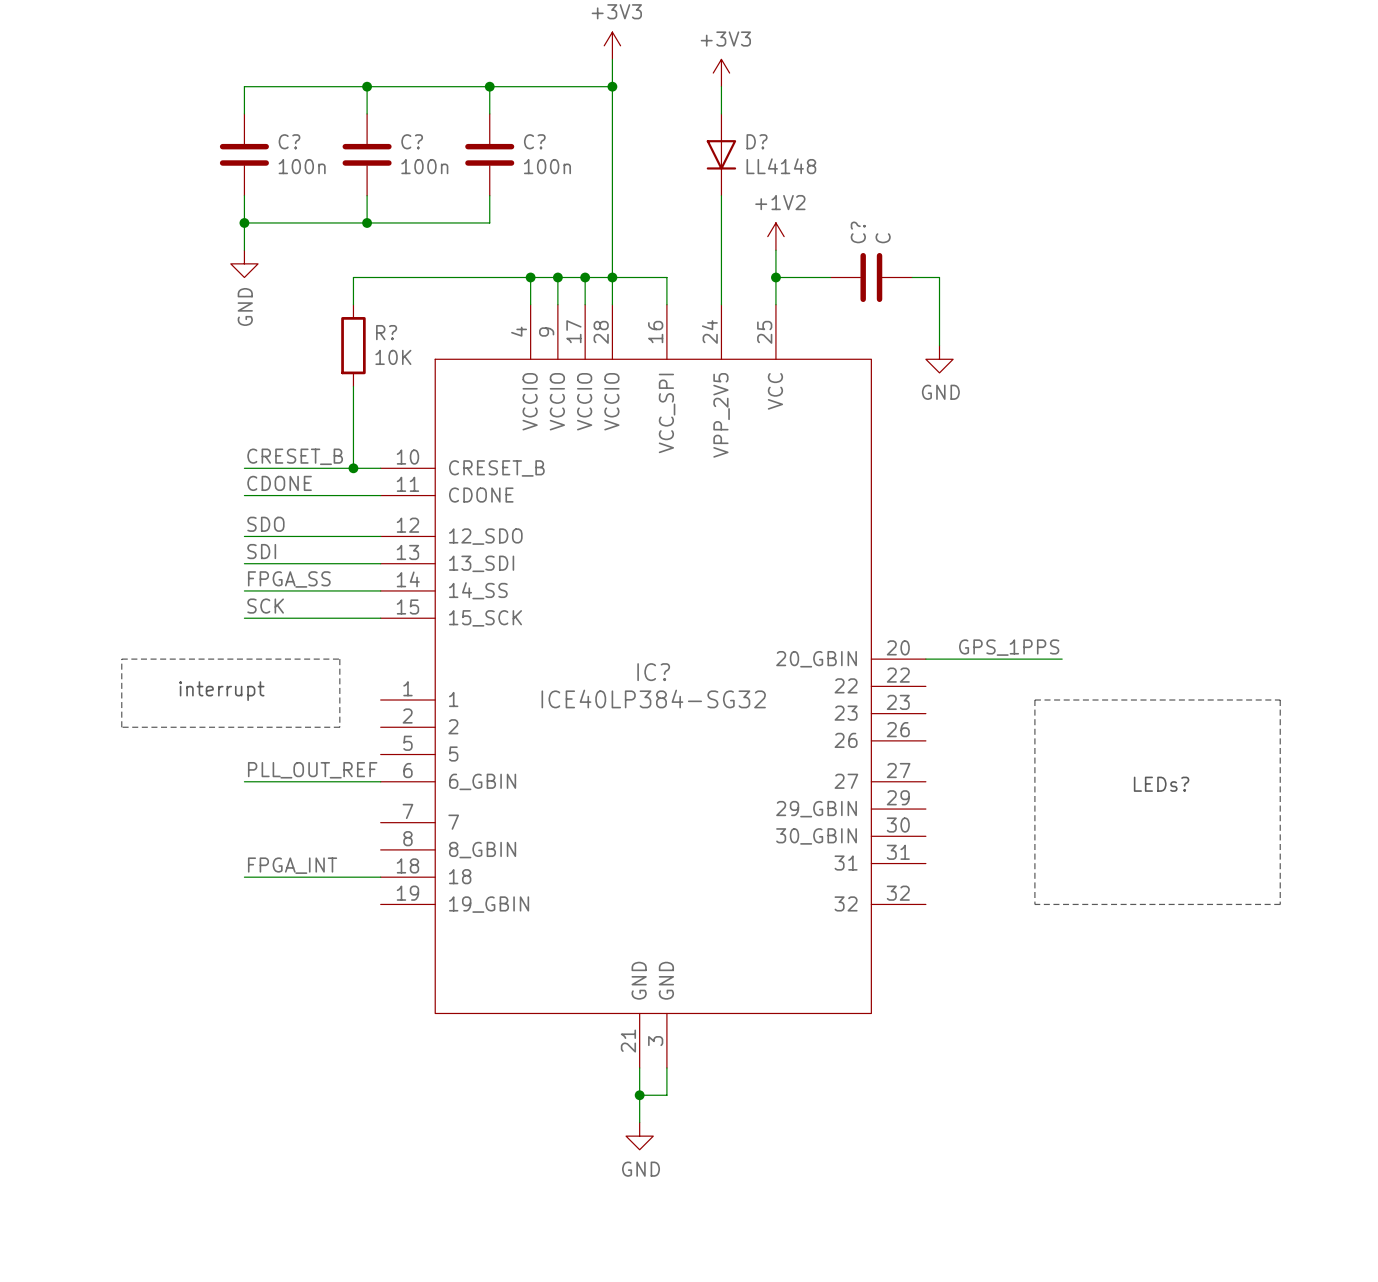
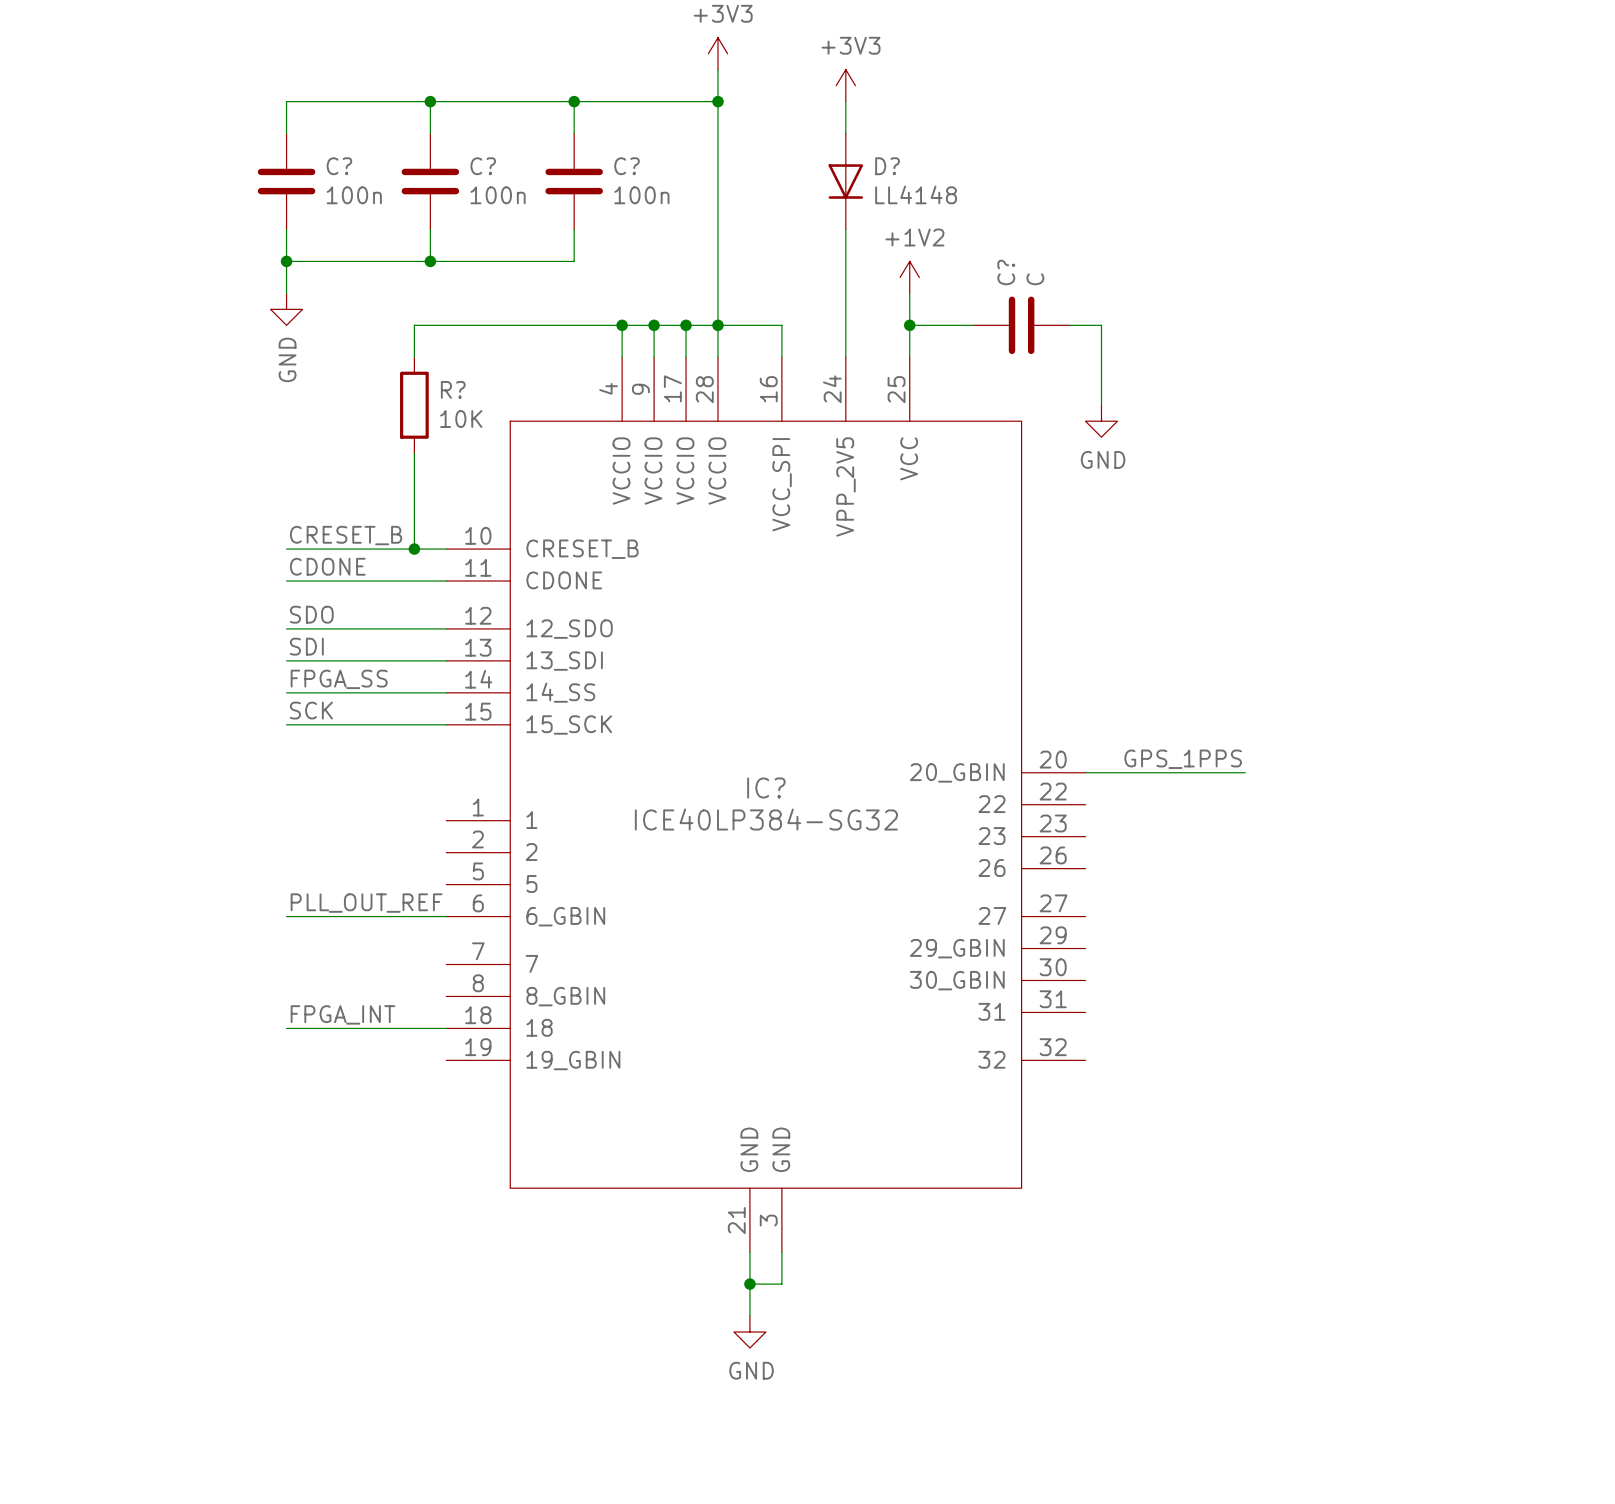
line: (121, 659) (121, 727) (339, 727) (339, 659) (121, 659) -> none
text: interrupt (221, 691) -> none
line: (1034, 700) (1280, 700) (1280, 904) (1034, 904) (1034, 700) -> none
text: LEDs? (1161, 784) -> none

